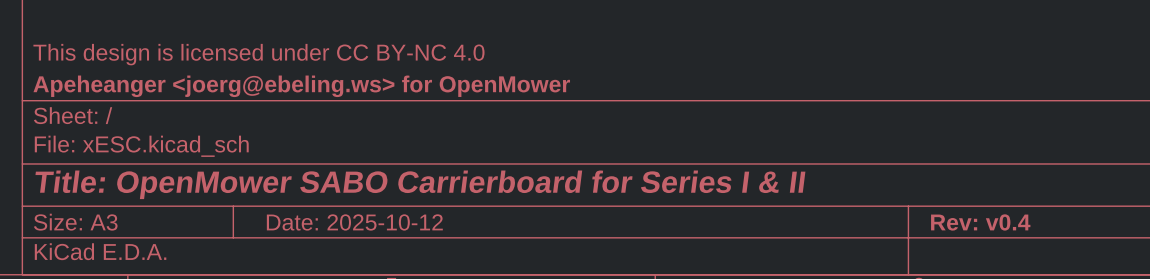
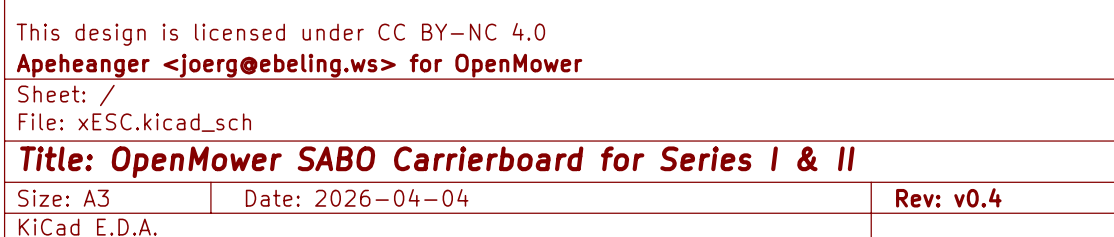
title block: Date: 2025-10-12 (354, 222) -> Date: 2026-04-04 (357, 197)

